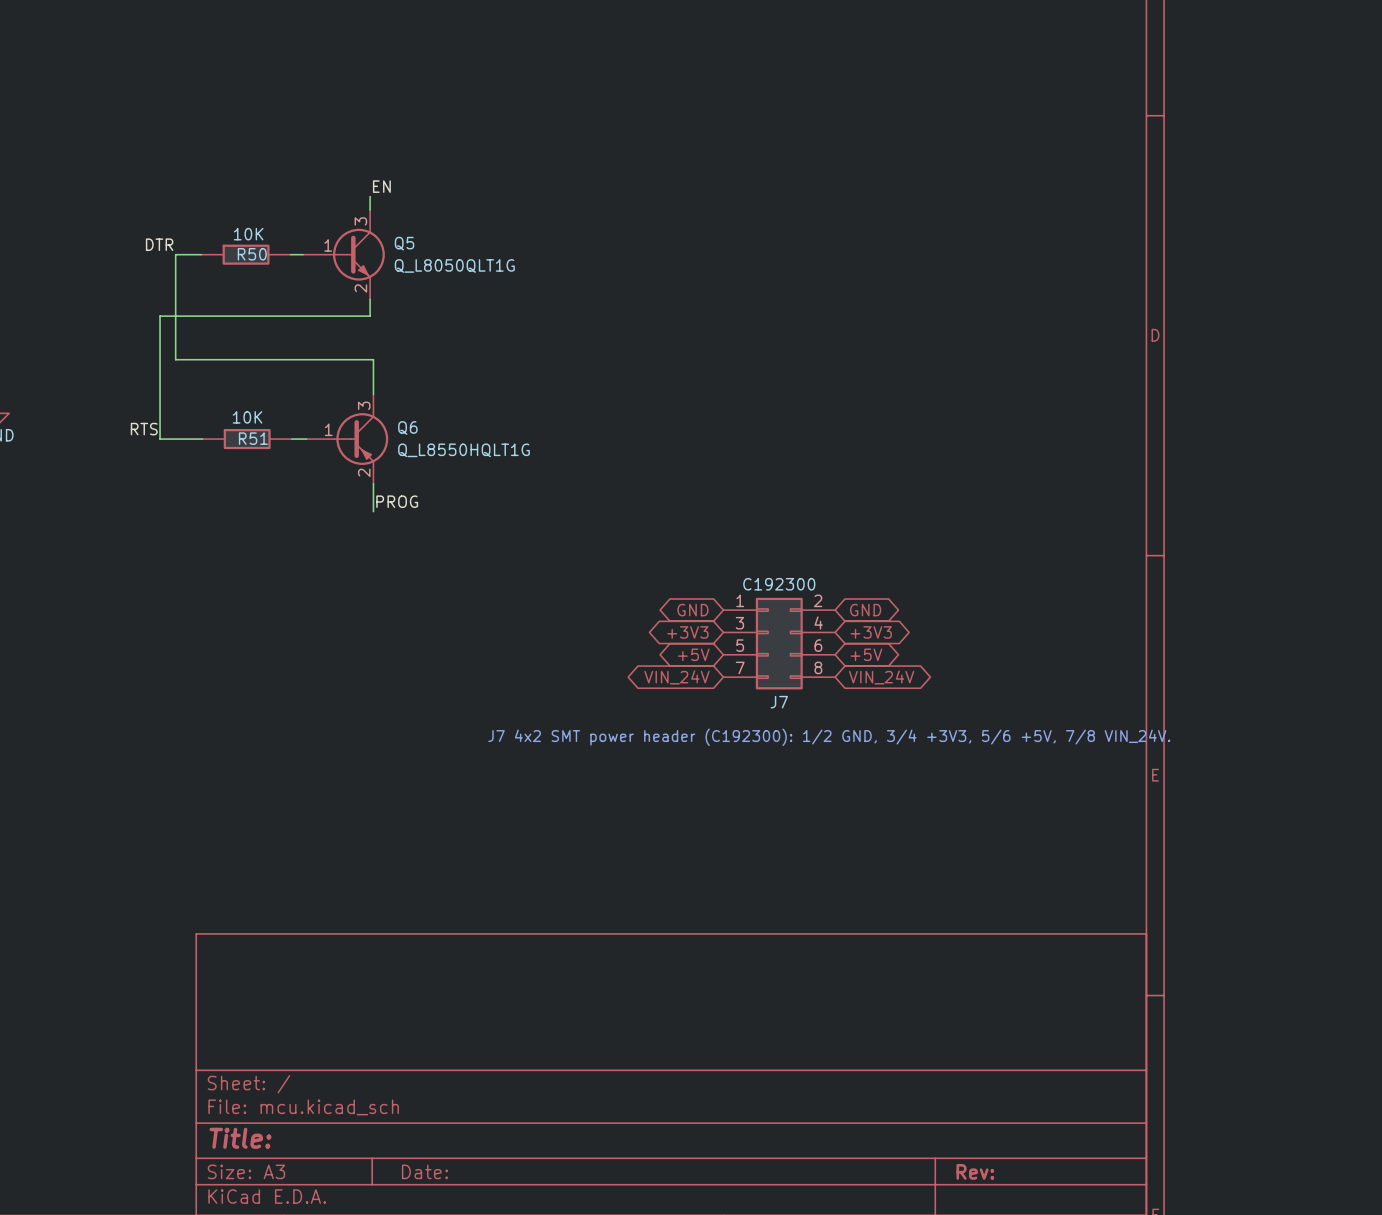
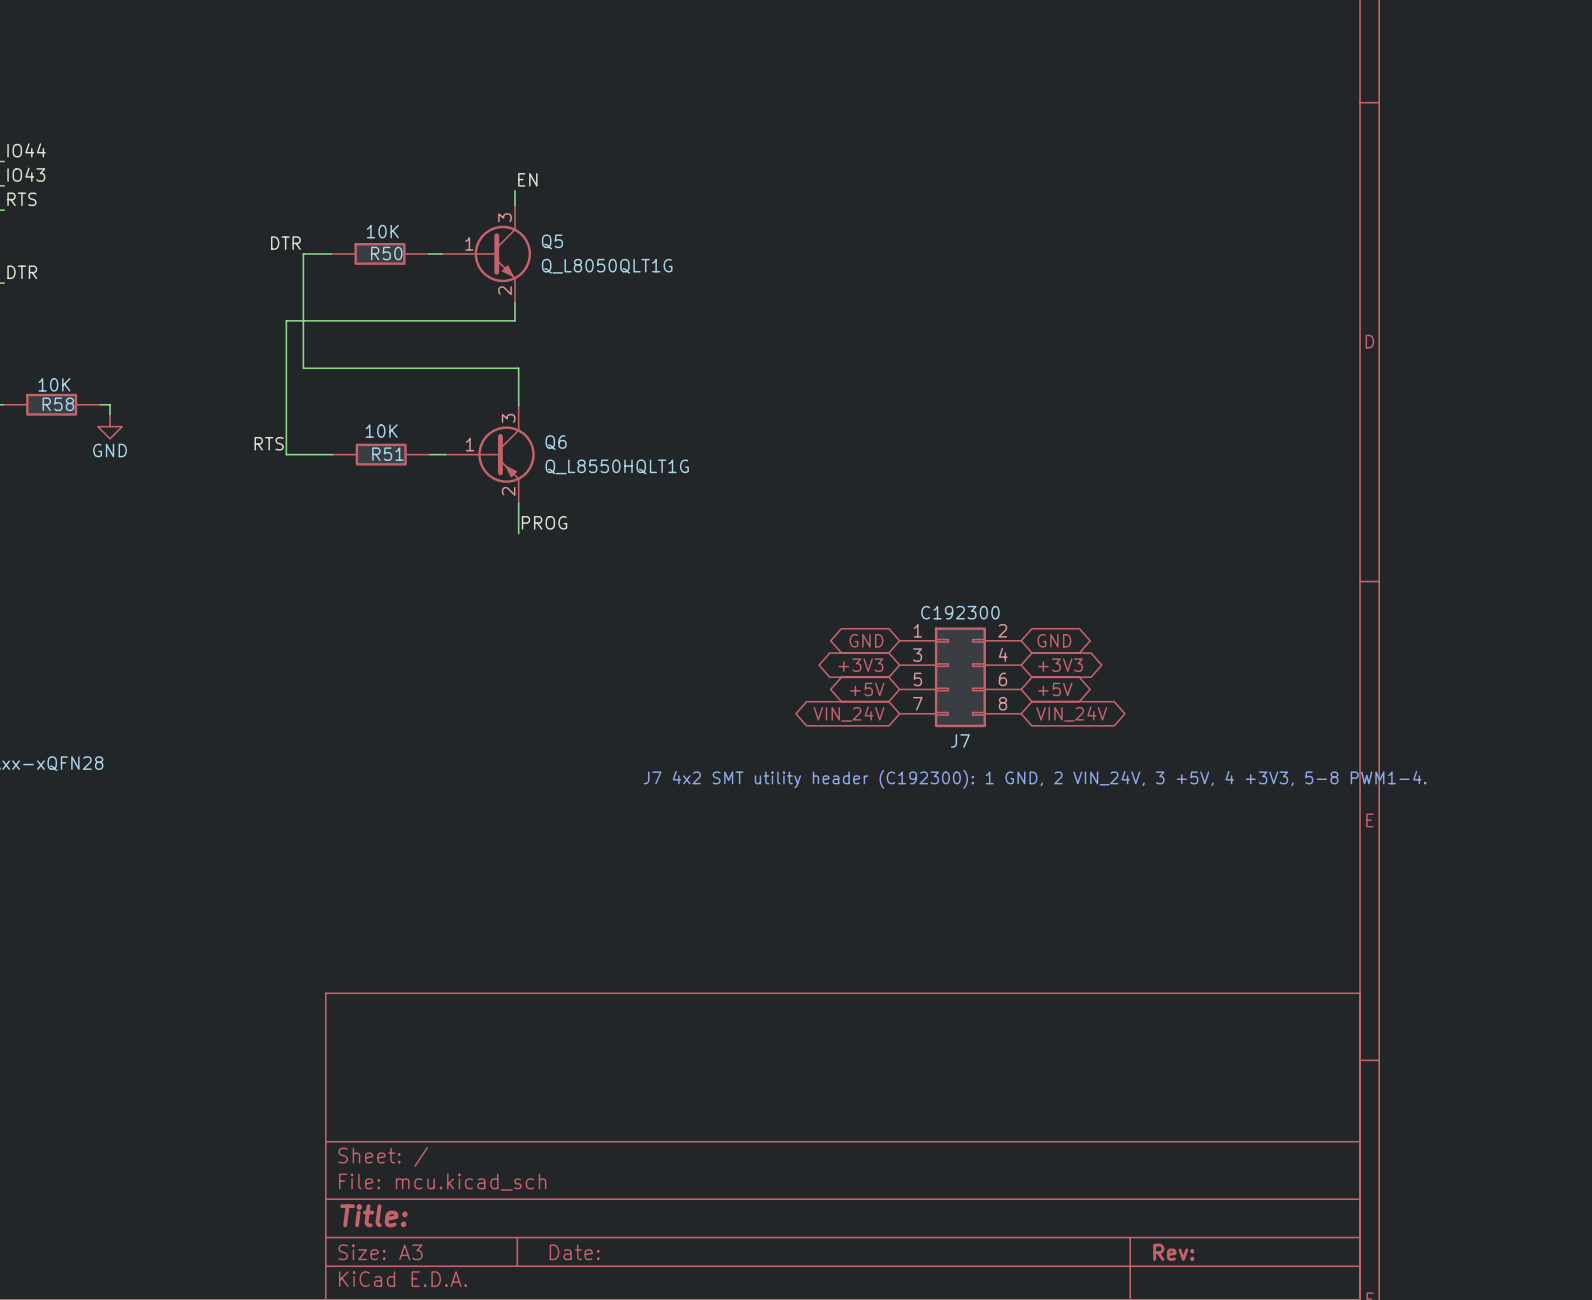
text: J7 4x2 SMT power header (C192300): 1/2 GND, 3/4 +3V3, 5/6 +5V, 7/8 VIN_24V. (829, 737) -> J7 4x2 SMT utility header (C192300): 1 GND, 2 VIN_24V, 3 +5V, 4 +3V3, 5-8 PWM1-4. (1035, 779)

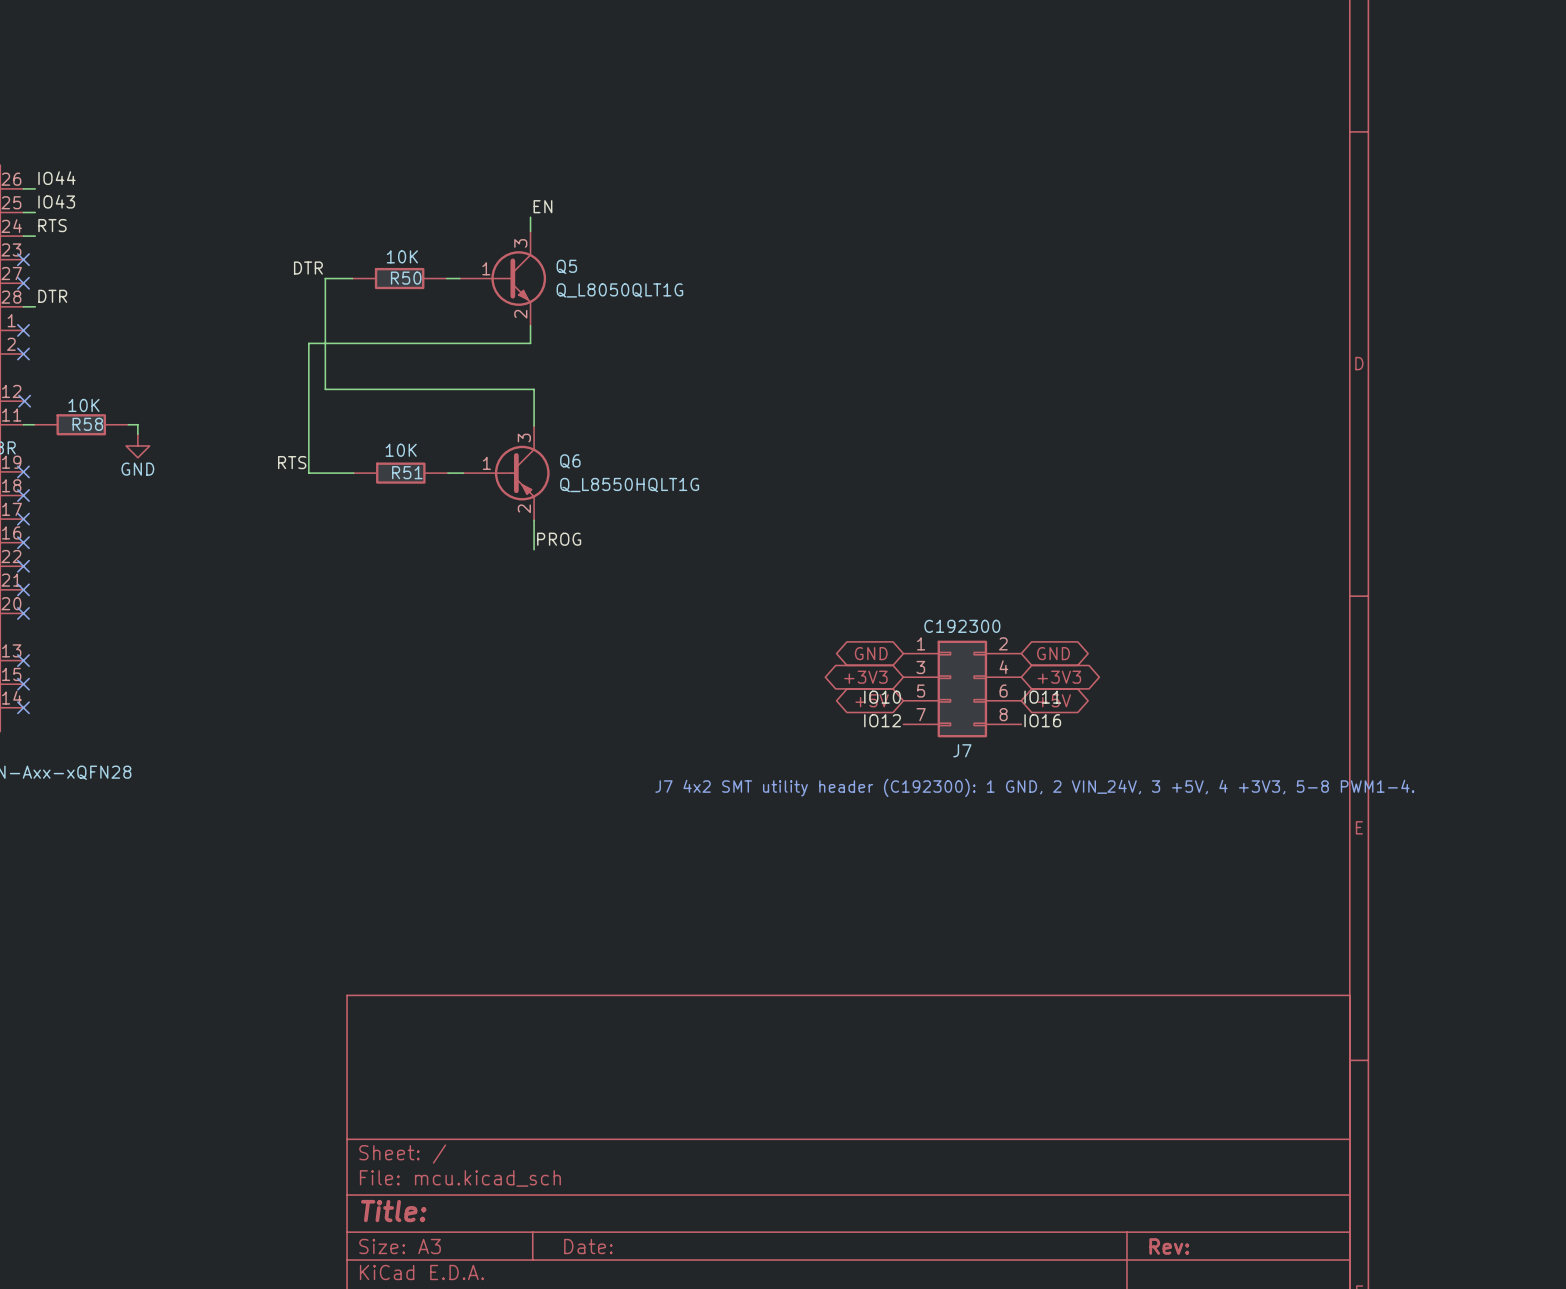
label: none -> IO10 (882, 697)
label: none -> IO11 (1042, 697)
label: none -> IO12 (882, 720)
label: none -> IO16 (1042, 720)
global label: VIN_24V (849, 714) -> none
global label: VIN_24V (1071, 714) -> none

